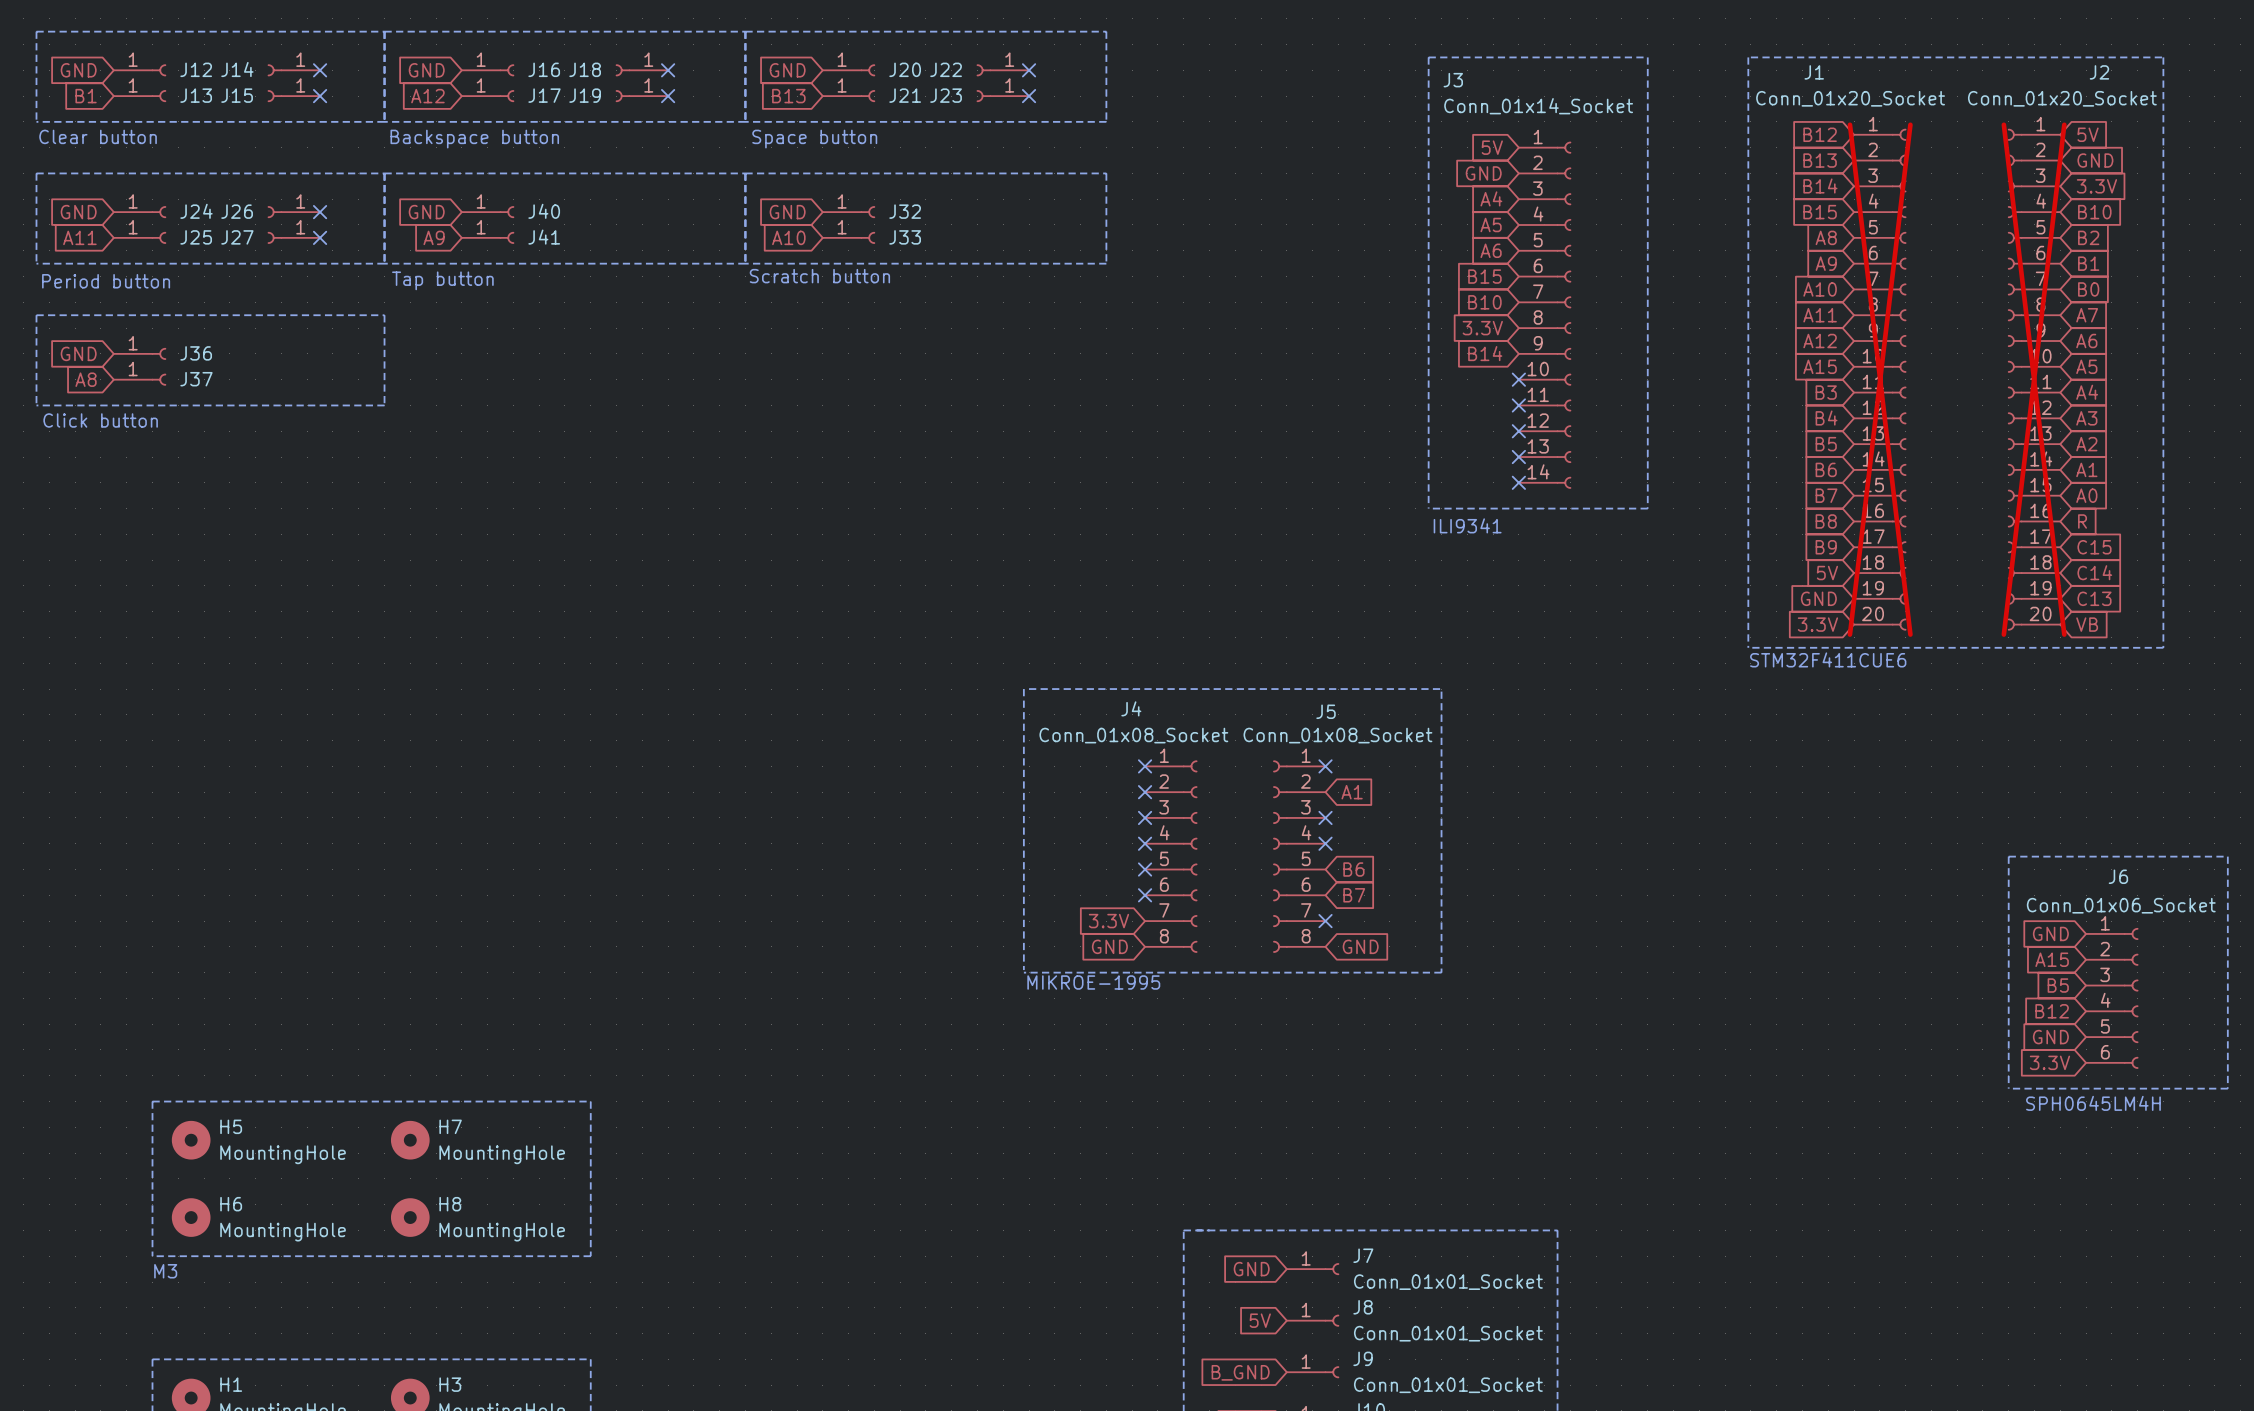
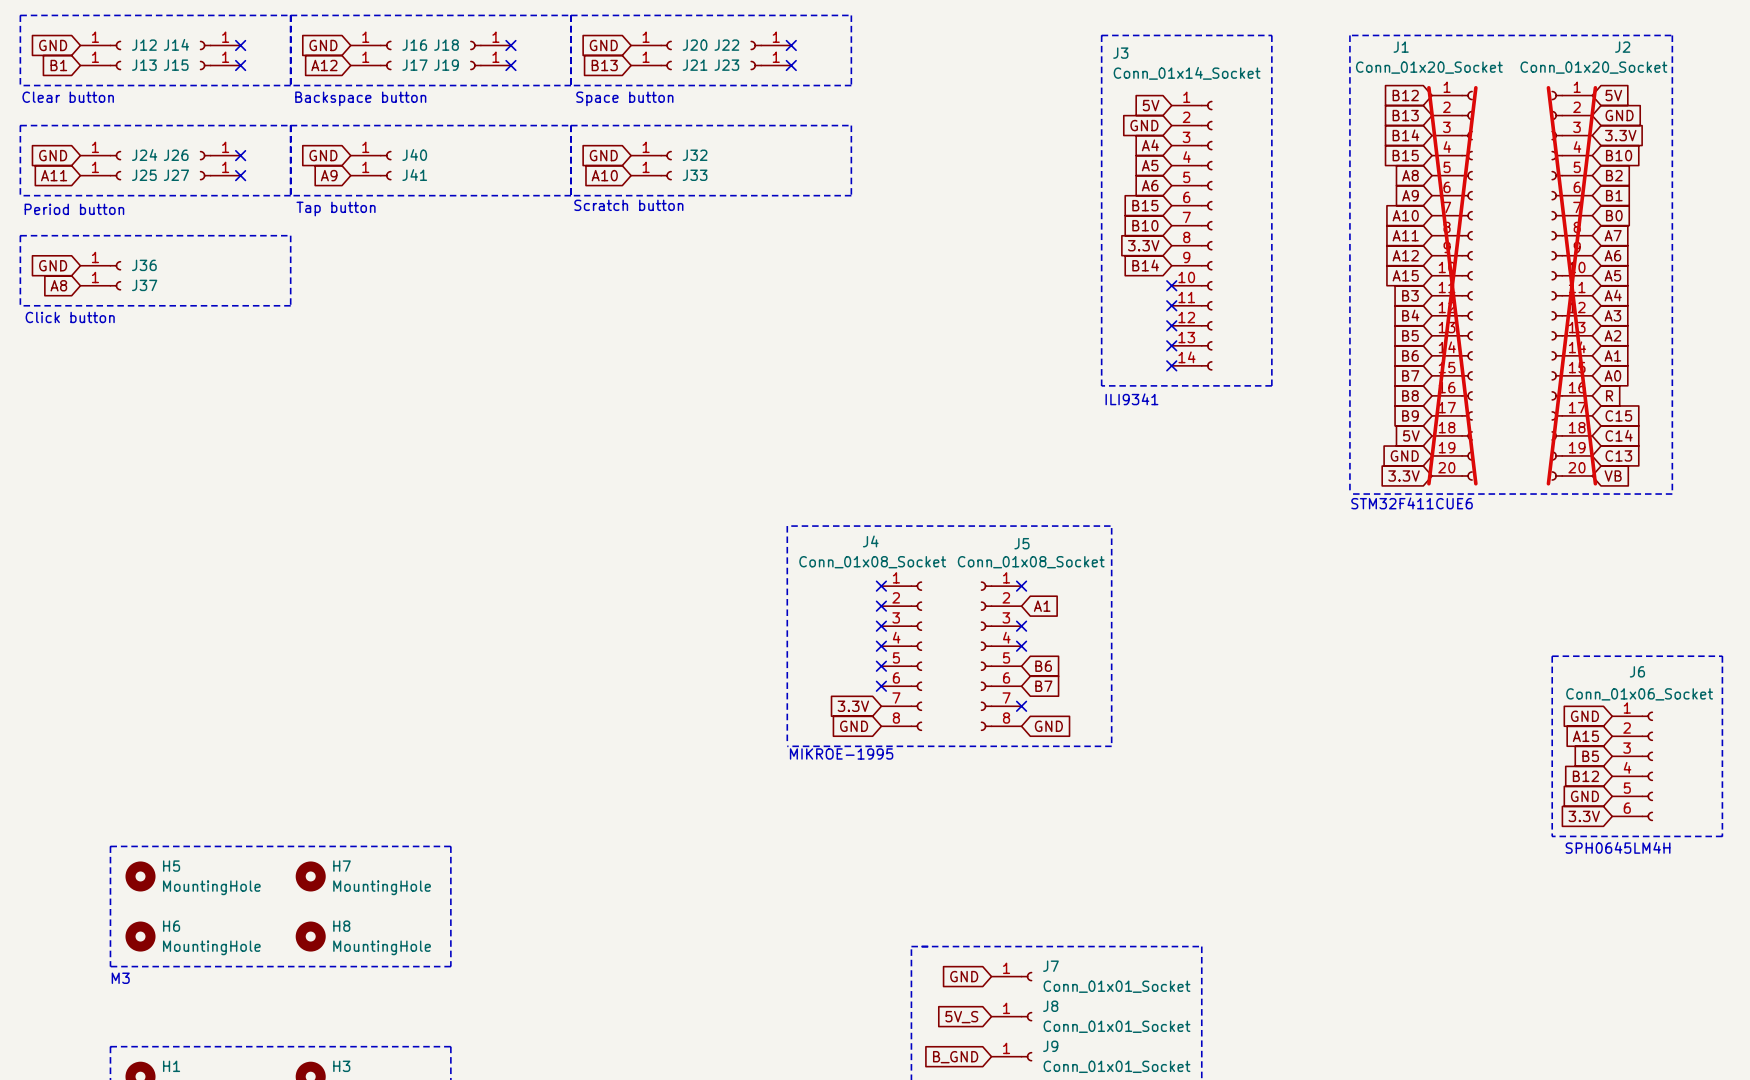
global label: 5V (1260, 1320) -> 5V_S (961, 1017)

